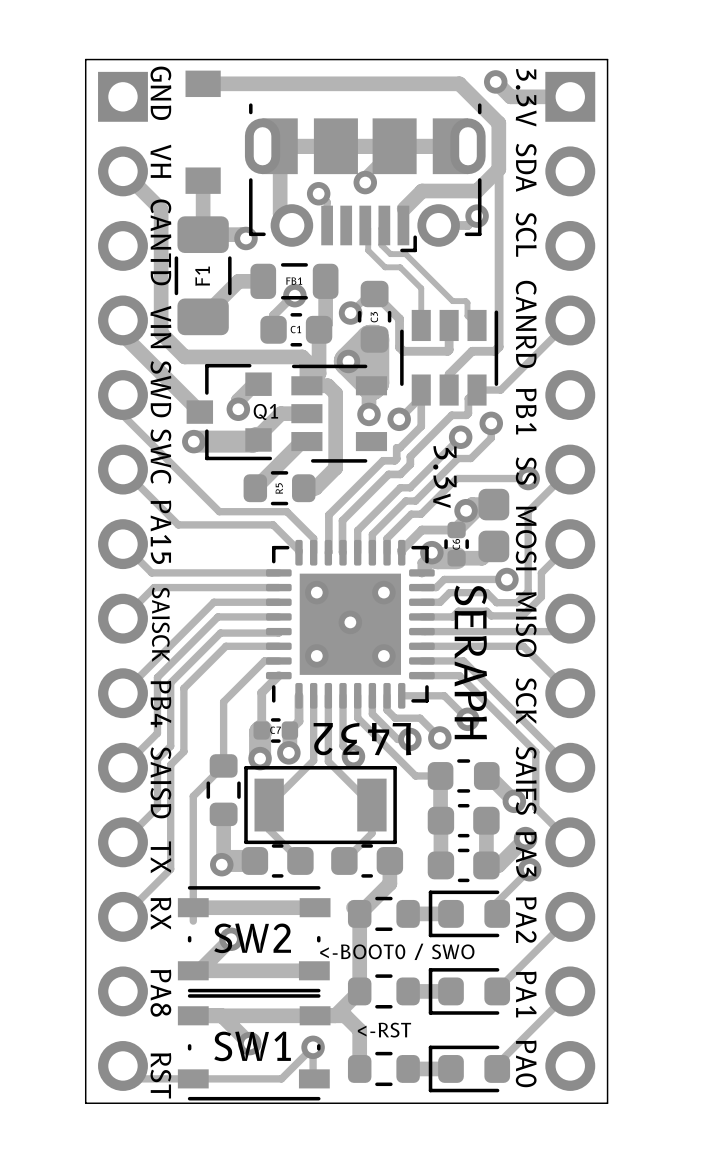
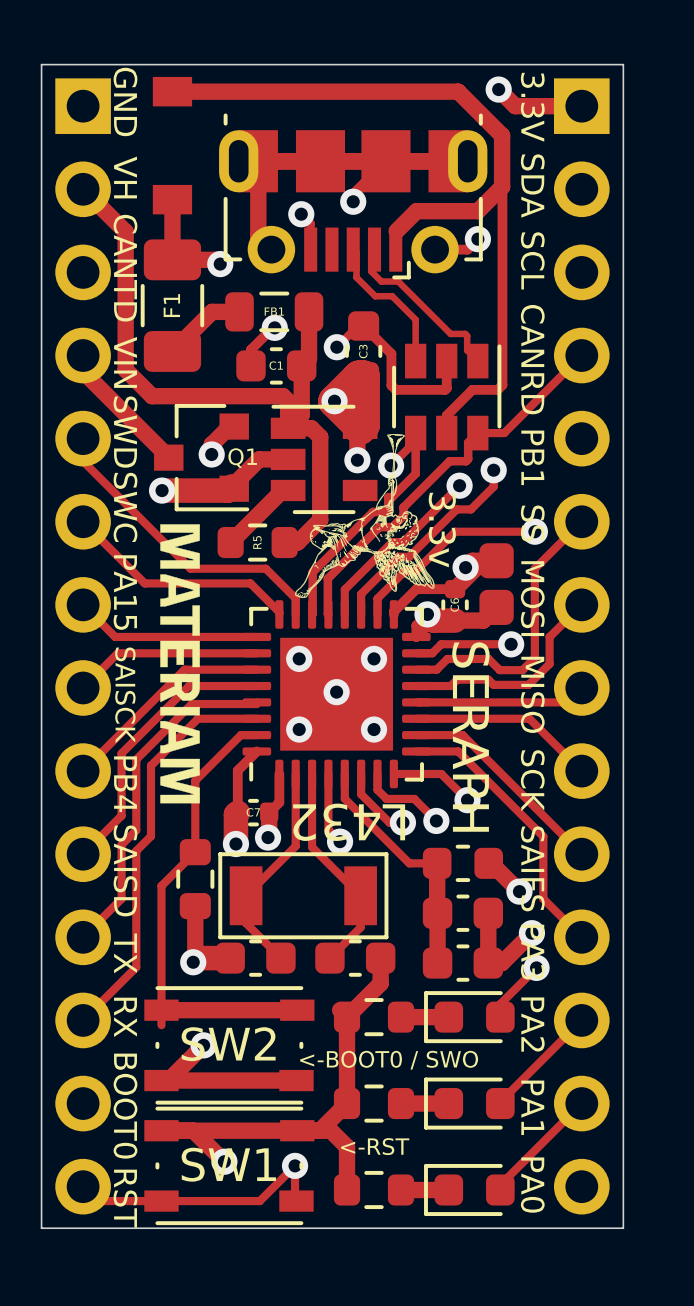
drawing: none -> [295, 433, 435, 599]
drawing: none -> [160, 524, 200, 804]
text: PA8 (160, 993) -> BOOT0 (125, 1106)

